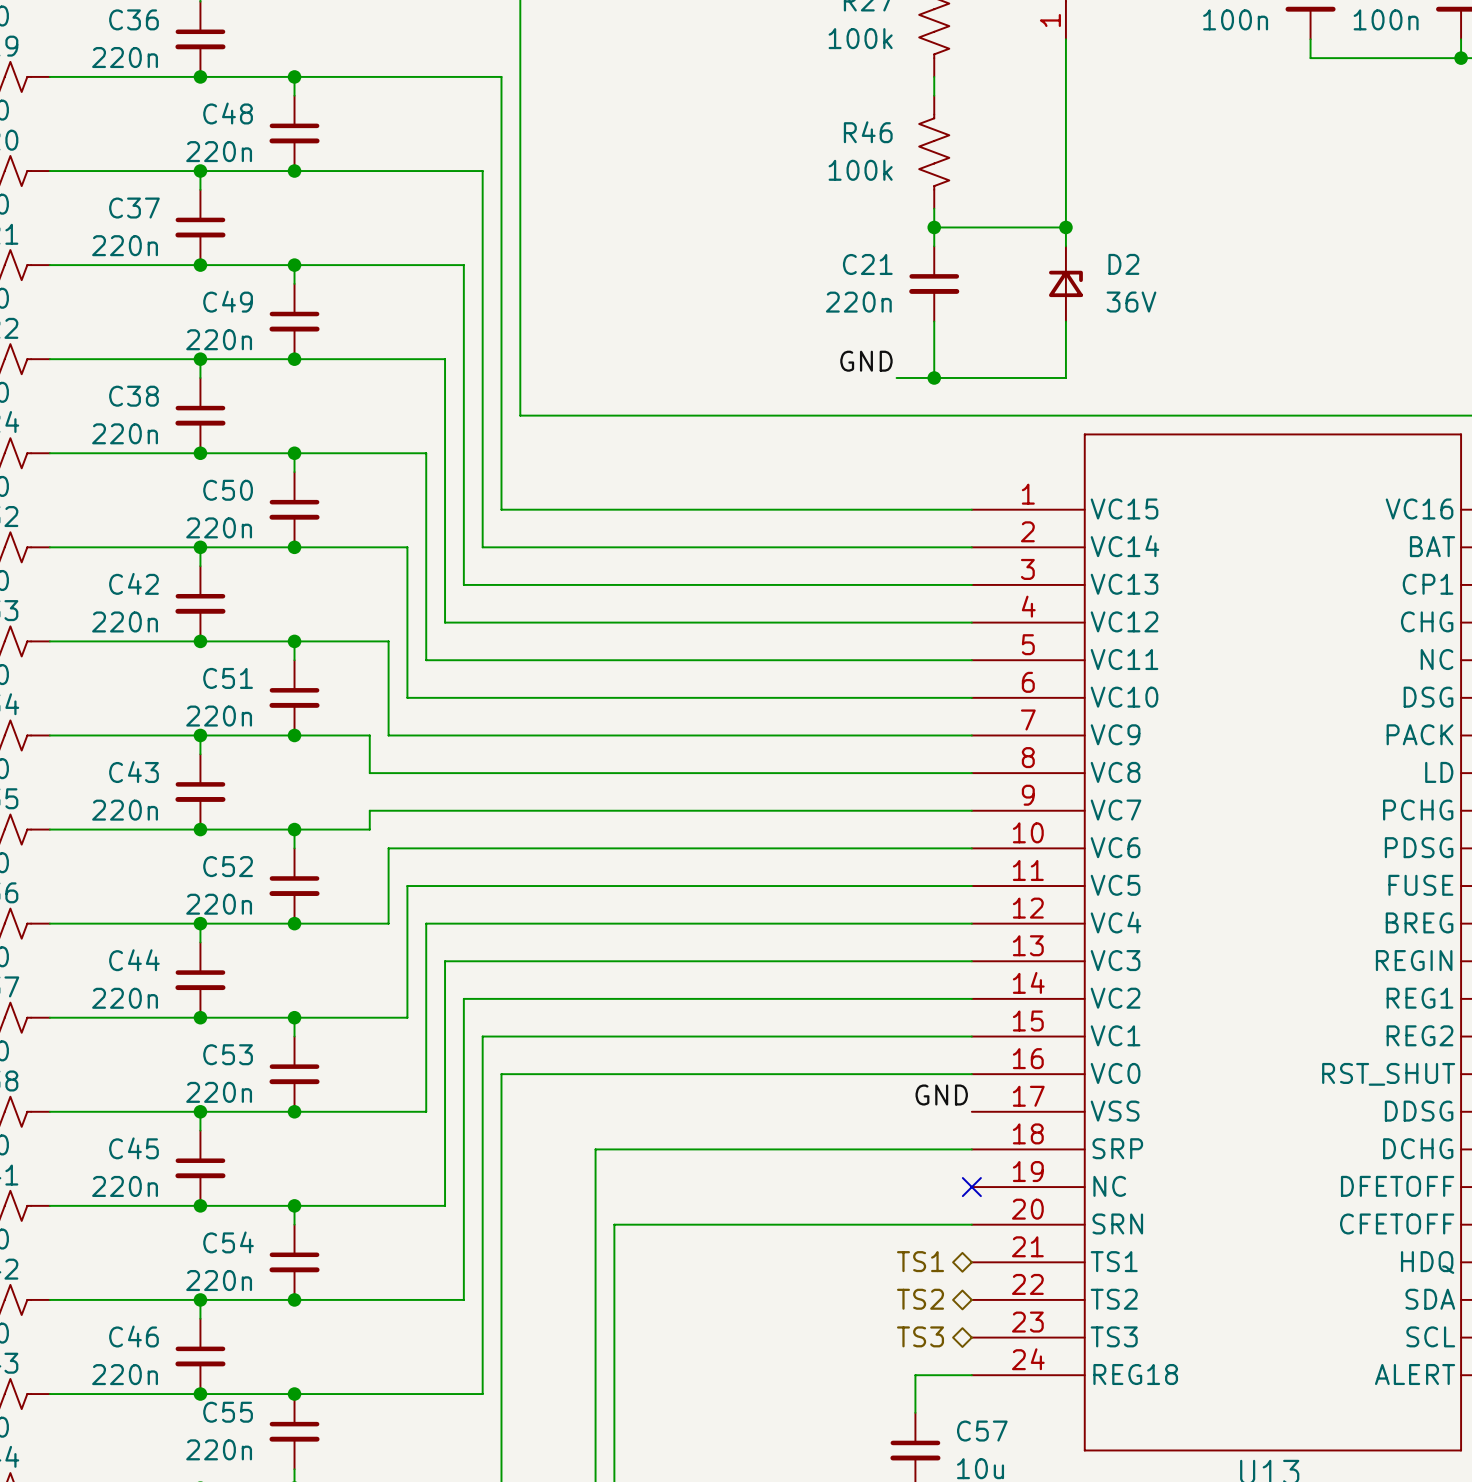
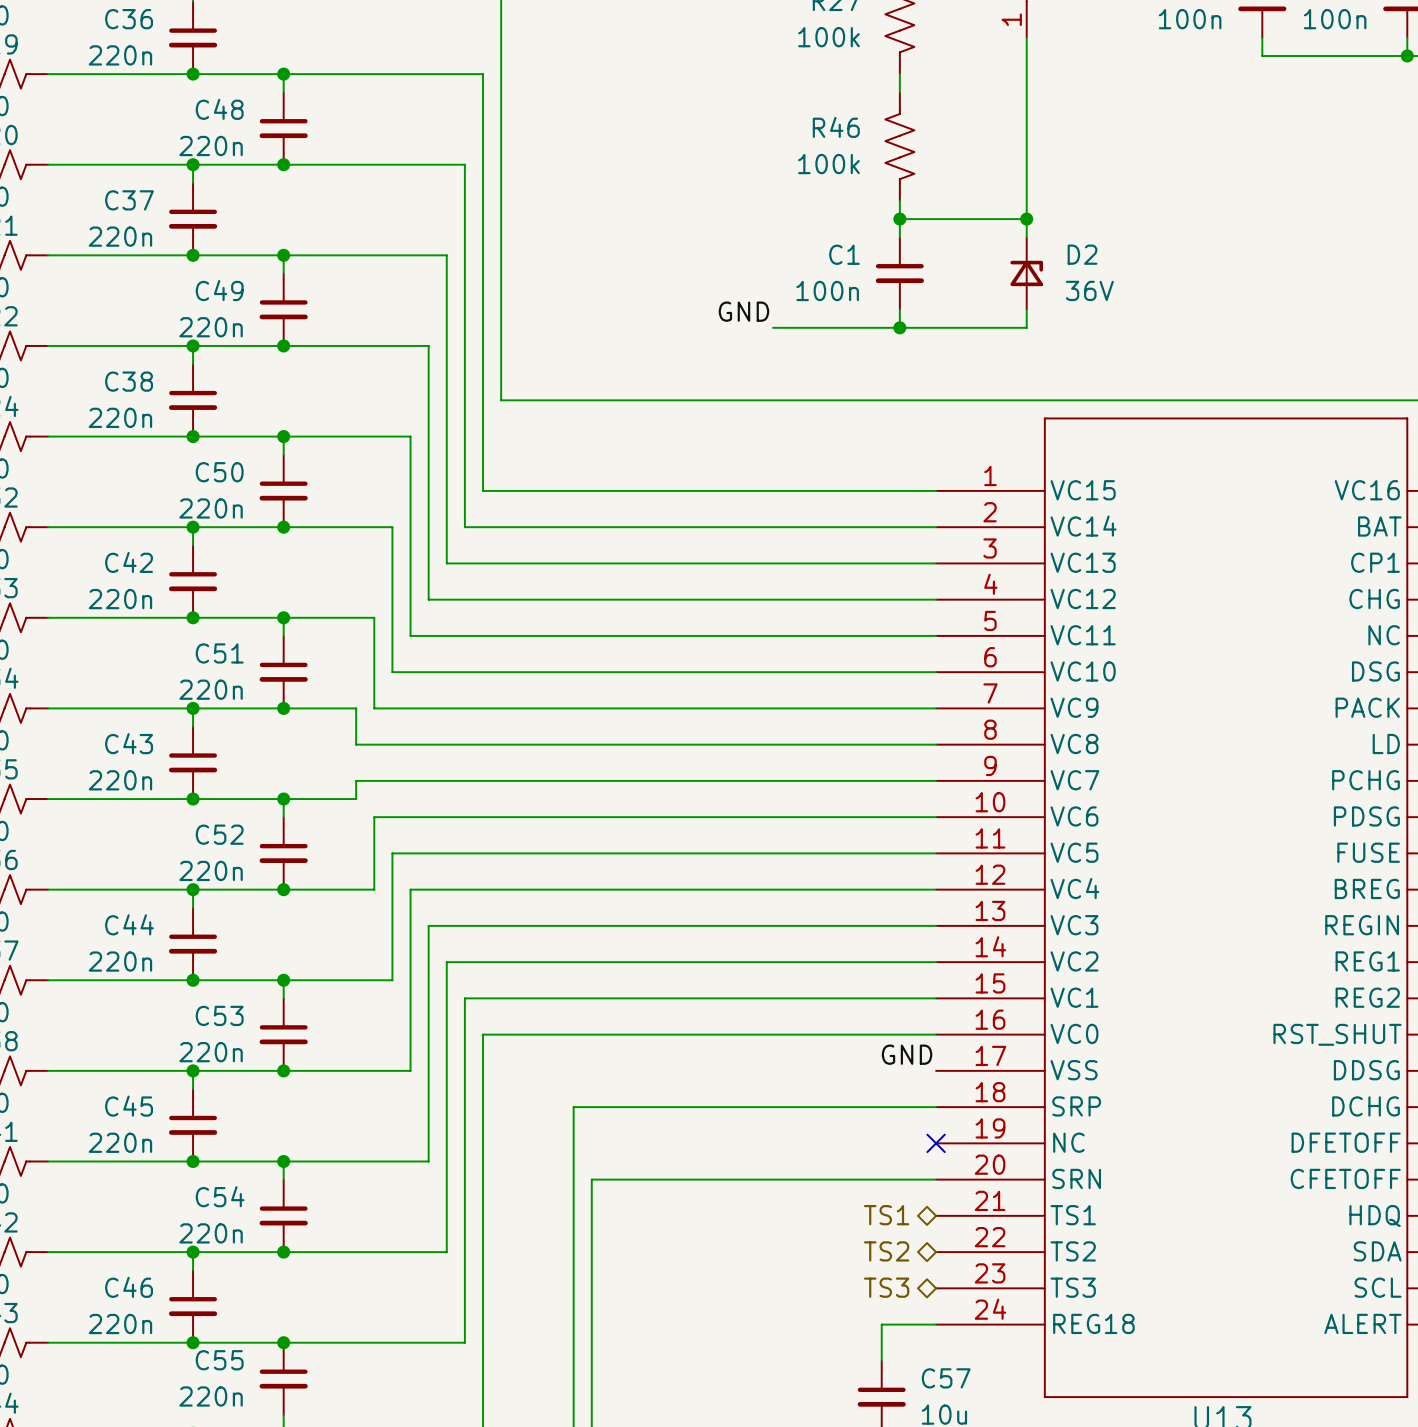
C21 name: C21 (867, 264) -> C1 (844, 254)
C21 value: 220n (858, 302) -> 100n (827, 290)
wire: (934, 340) (934, 377) -> none
wire: (1065, 340) (1065, 377) (896, 377) -> (1026, 327) (772, 327)
label position: GND (866, 361) -> GND (743, 311)
junction position: (934, 377) -> (899, 327)

